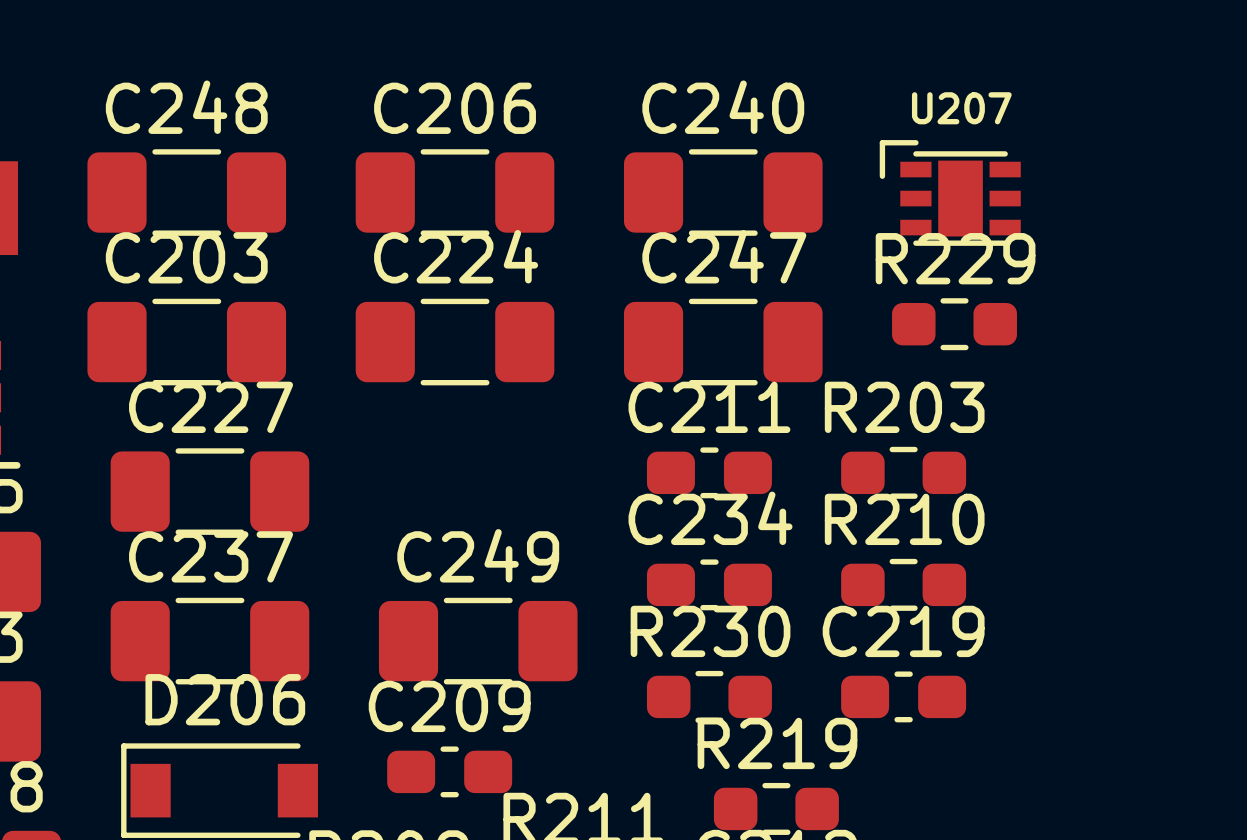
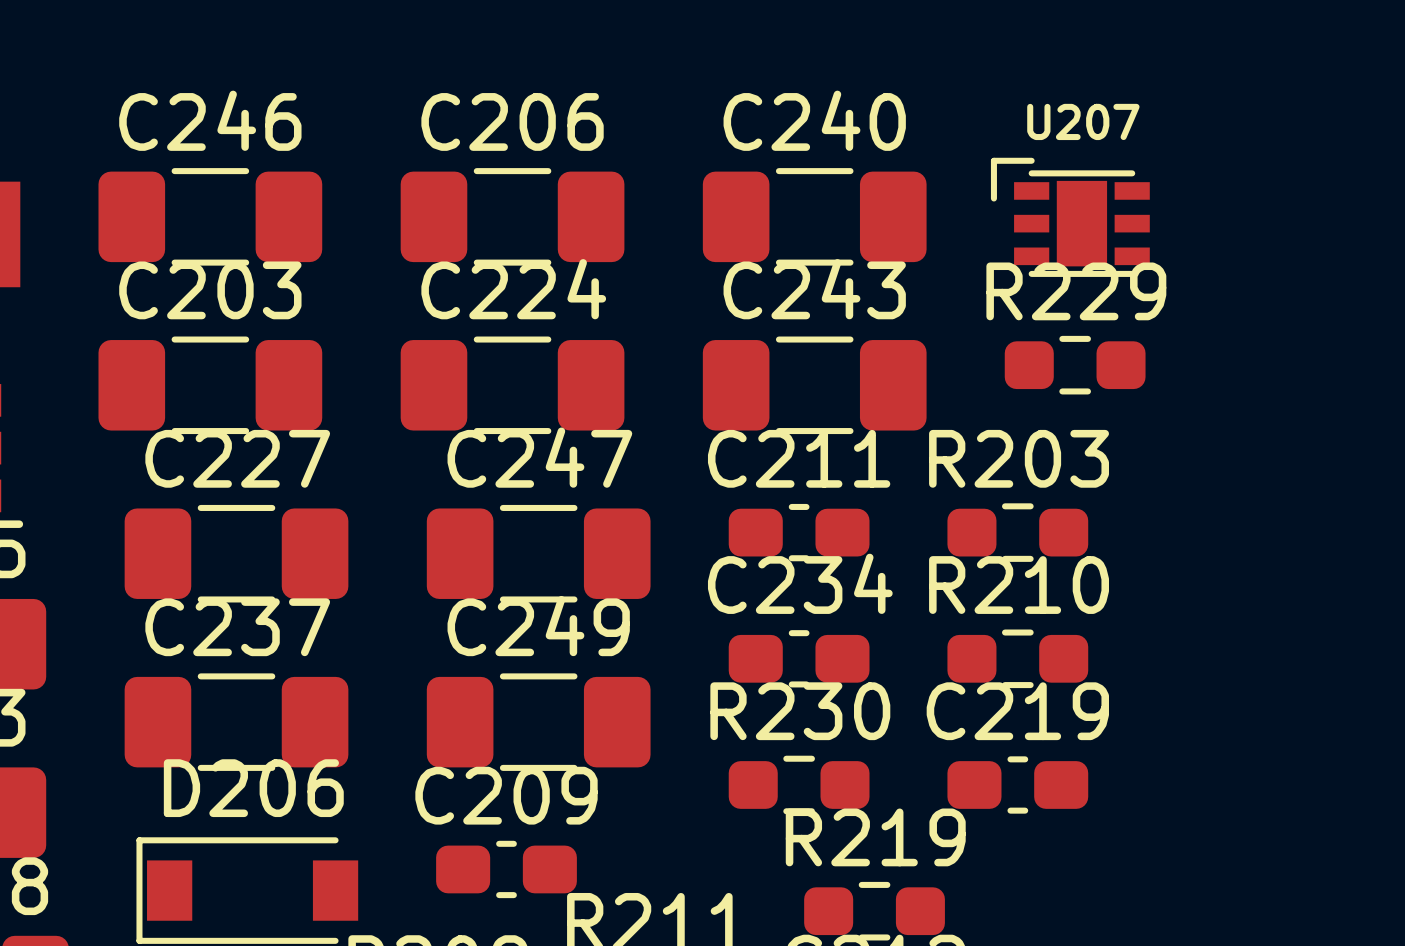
C248 name: C248 (186, 107) -> C246 (210, 120)
C247 name: C247 (724, 256) -> C243 (814, 289)
C247: none -> (538, 553)

